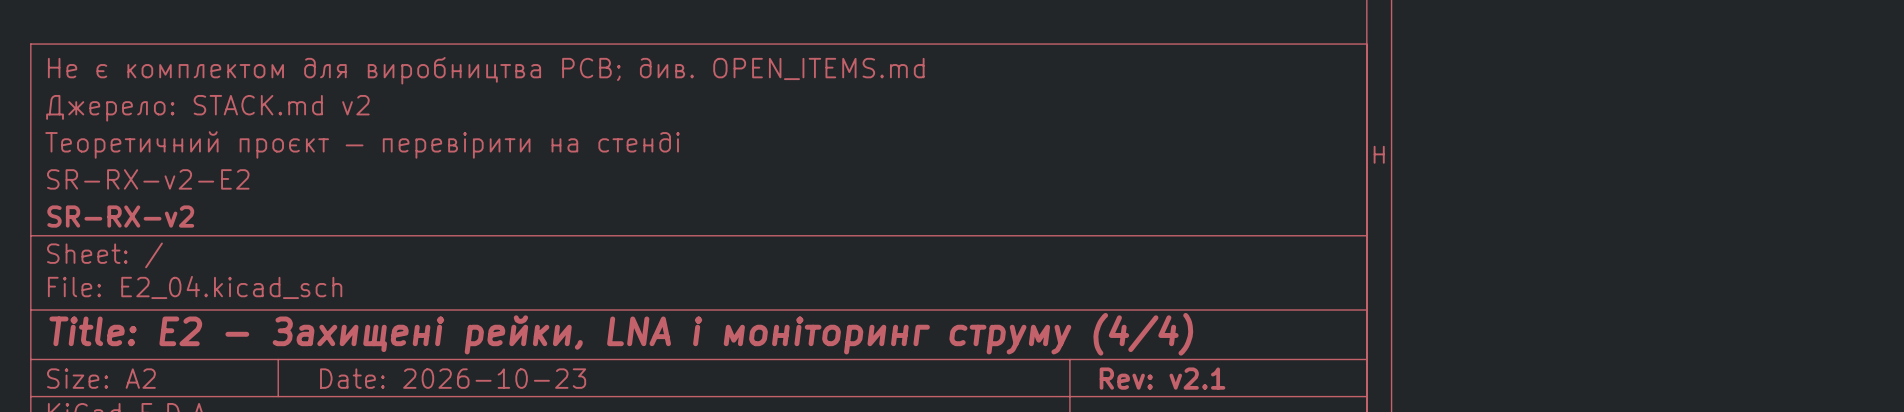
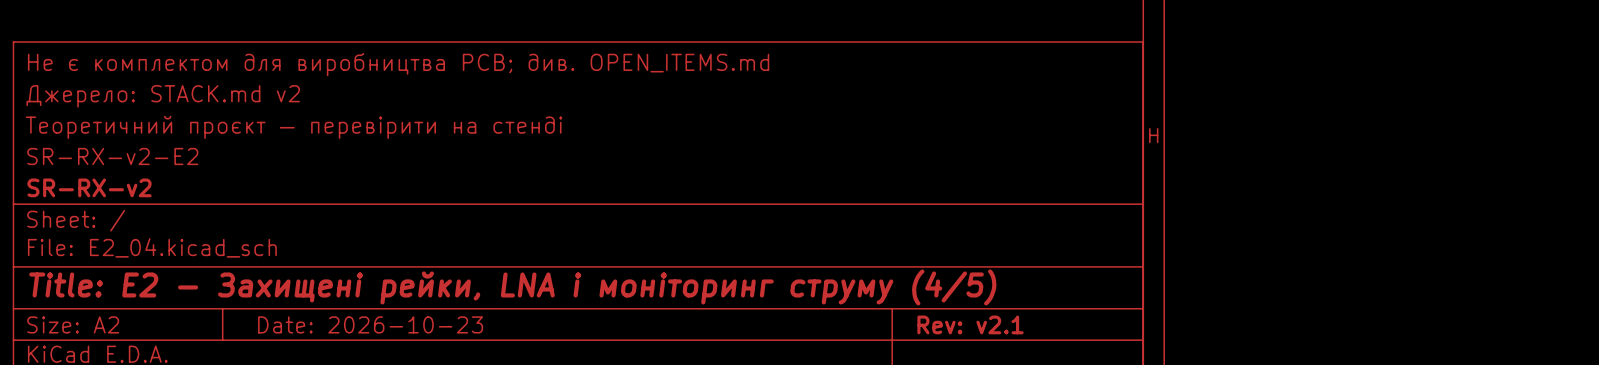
title block: Title: E2 - Захищені рейки, LNA і моніторинг струму (4/4) (621, 334) -> Title: E2 - Захищені рейки, LNA і моніторинг струму (4/5) (512, 287)

